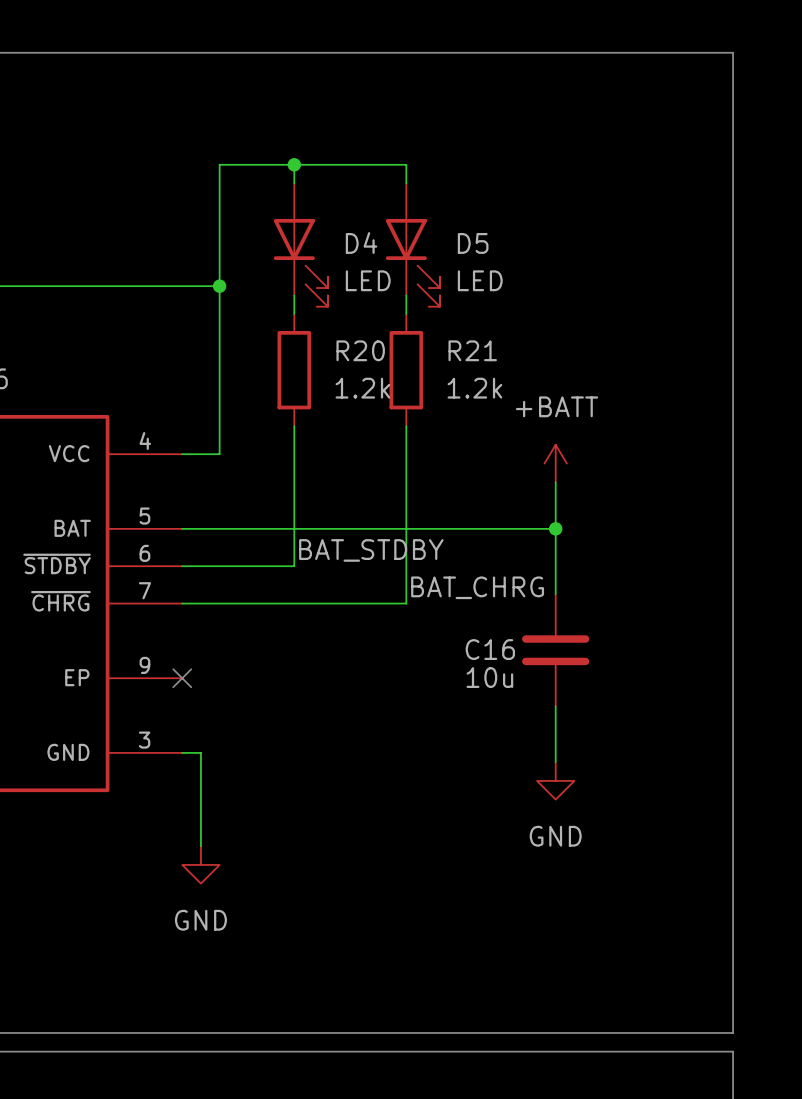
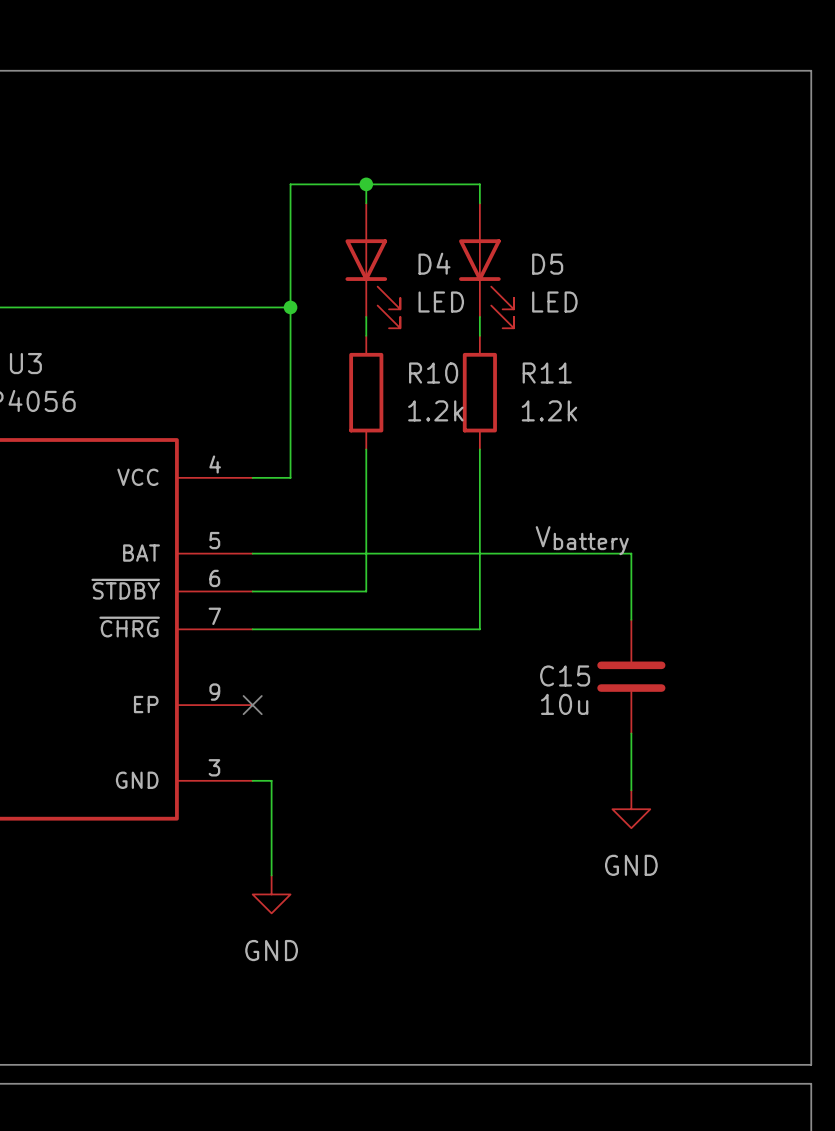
R20 name: R20 (360, 350) -> R10 (433, 373)
R21 name: R21 (472, 350) -> R11 (547, 373)
power symbol: +BATT (555, 463) -> none
wire: (555, 482) (555, 528) -> none
label: none -> Vbattery (582, 540)
junction: (555, 528) -> none
label: BAT_STDBY (371, 550) -> none
label: BAT_CHRG (477, 587) -> none
C16 name: C16 (490, 649) -> C15 (565, 675)

